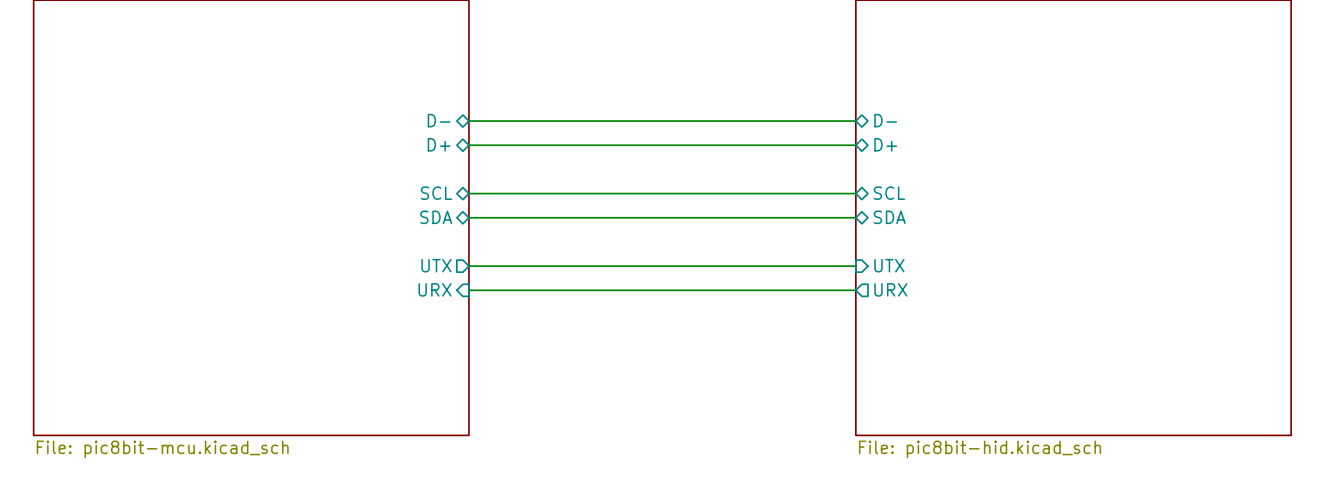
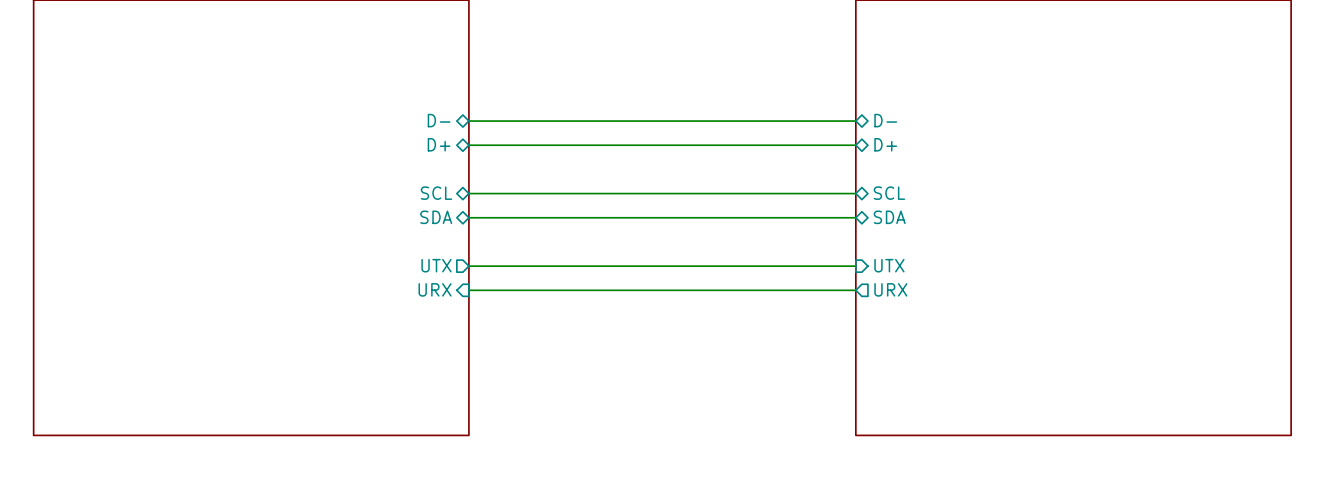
sheet value: File: pic8bit-mcu.kicad_sch (162, 449) -> none
sheet value: File: pic8bit-hid.kicad_sch (980, 449) -> none

